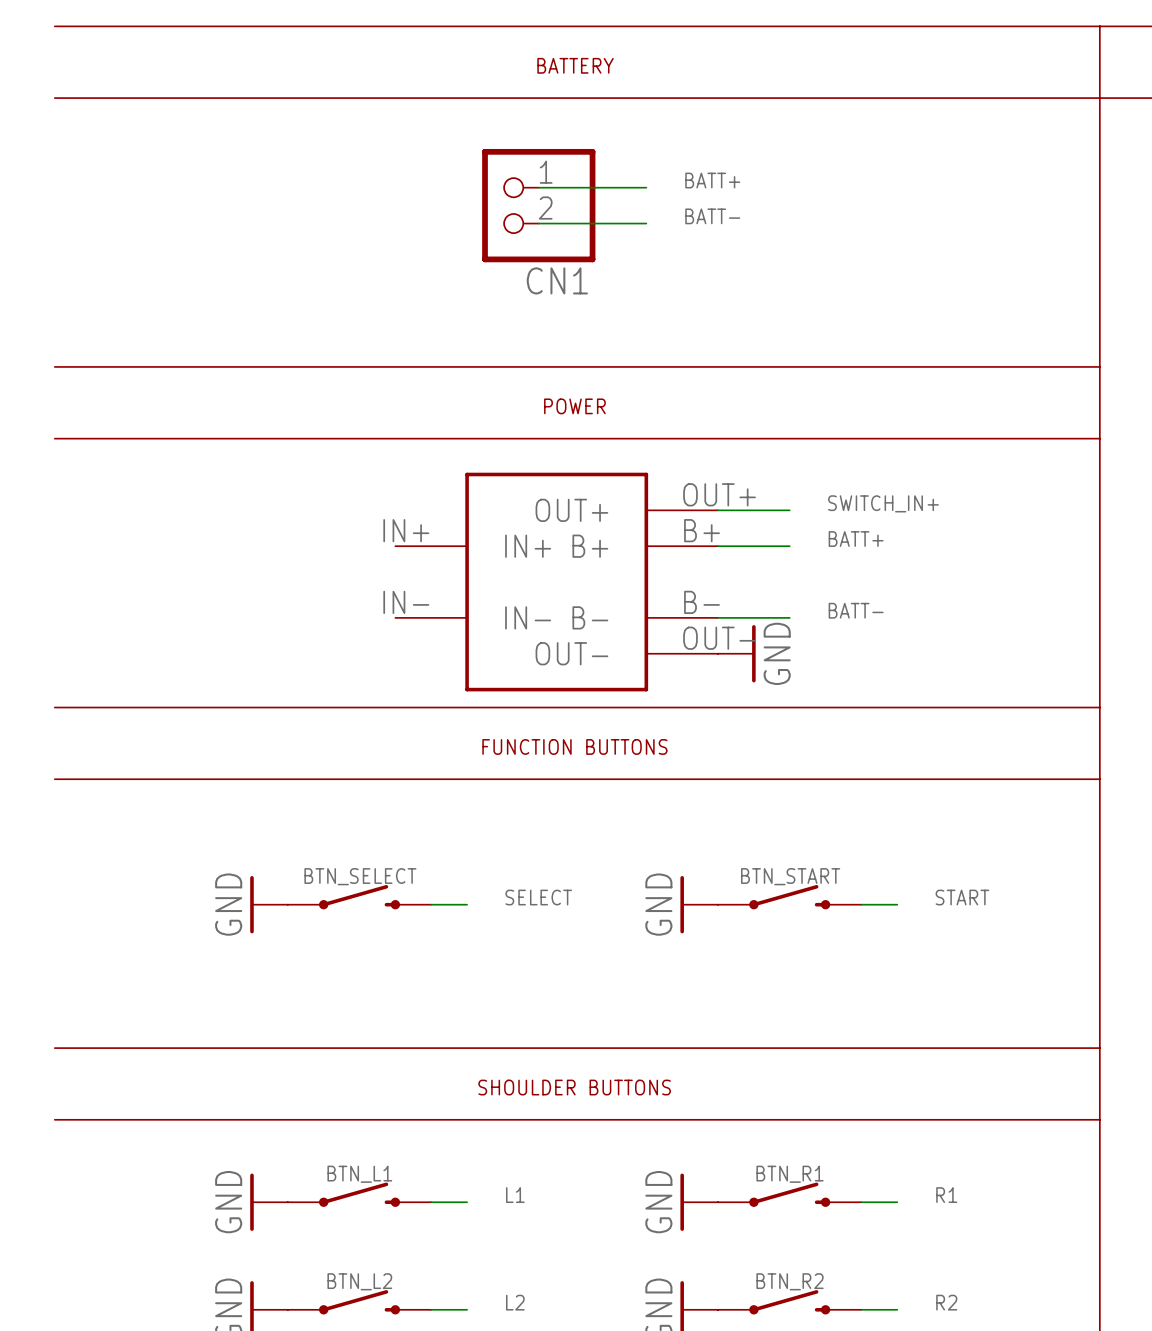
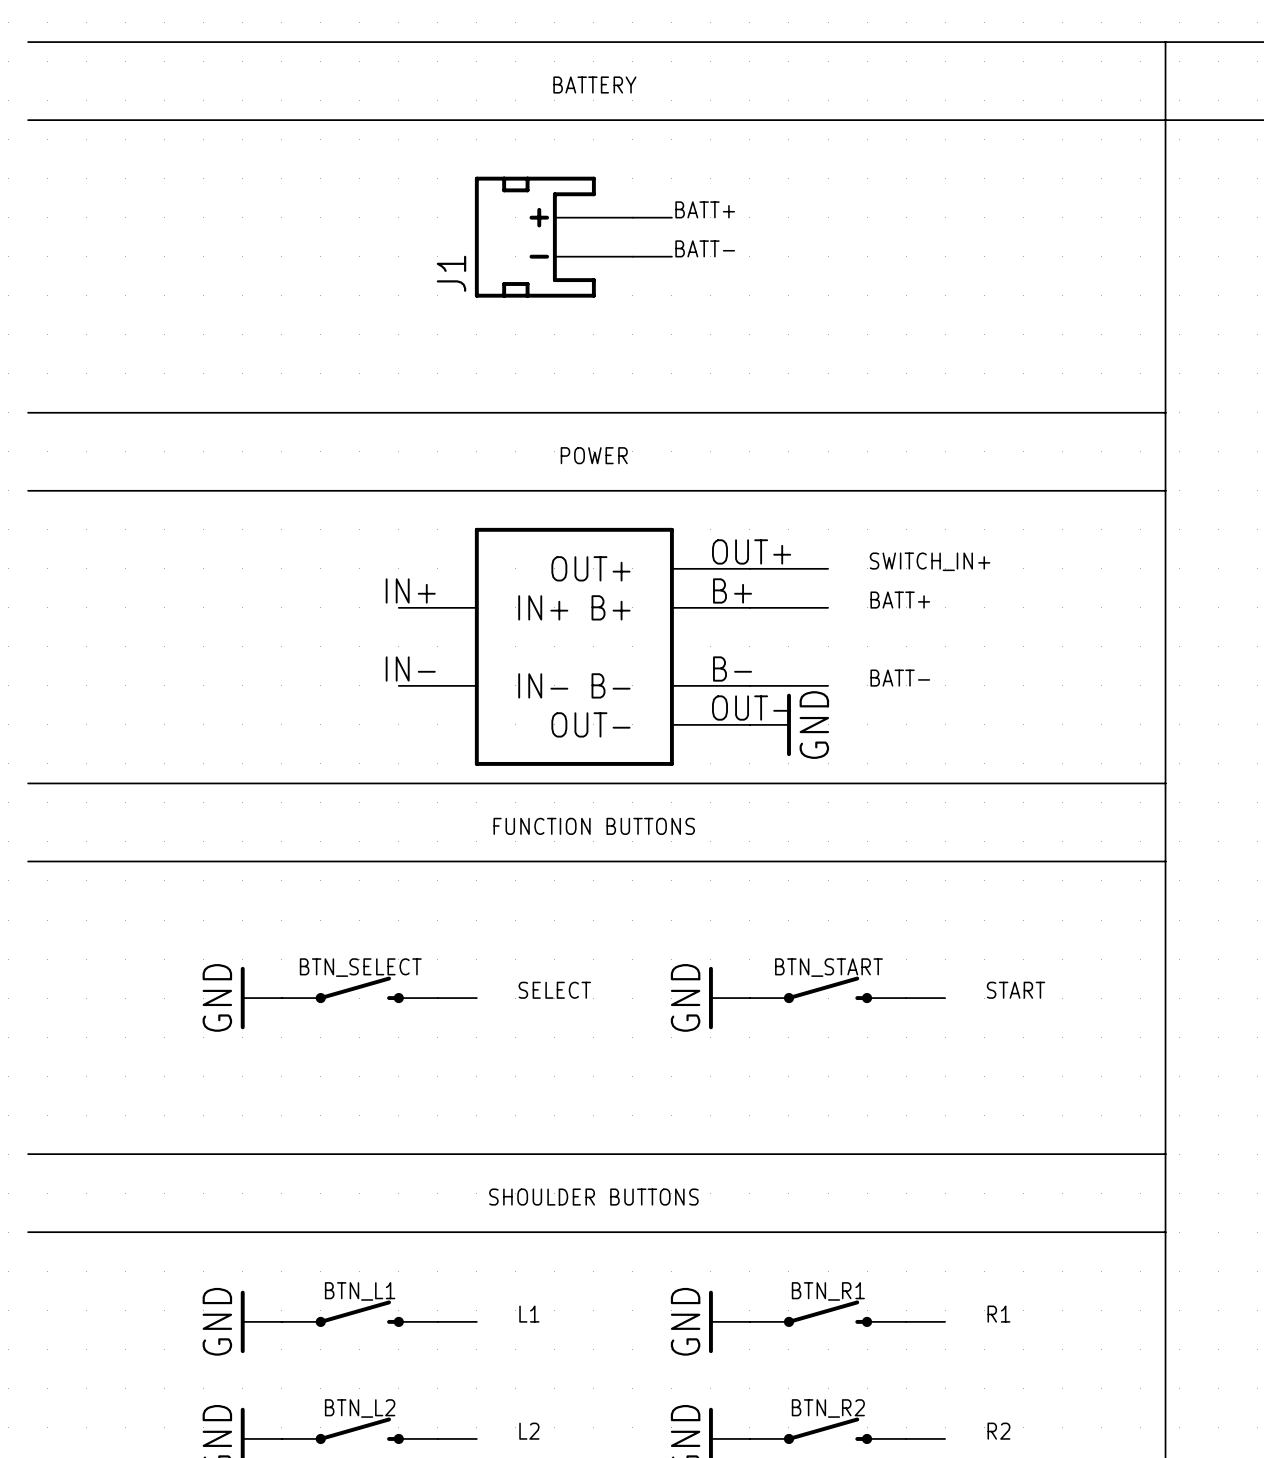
label position: BATT+ (712, 180) -> BATT+ (705, 209)
J1: none -> (553, 237)
CN1: (538, 205) -> none
label position: BATT- (712, 216) -> BATT- (705, 248)

